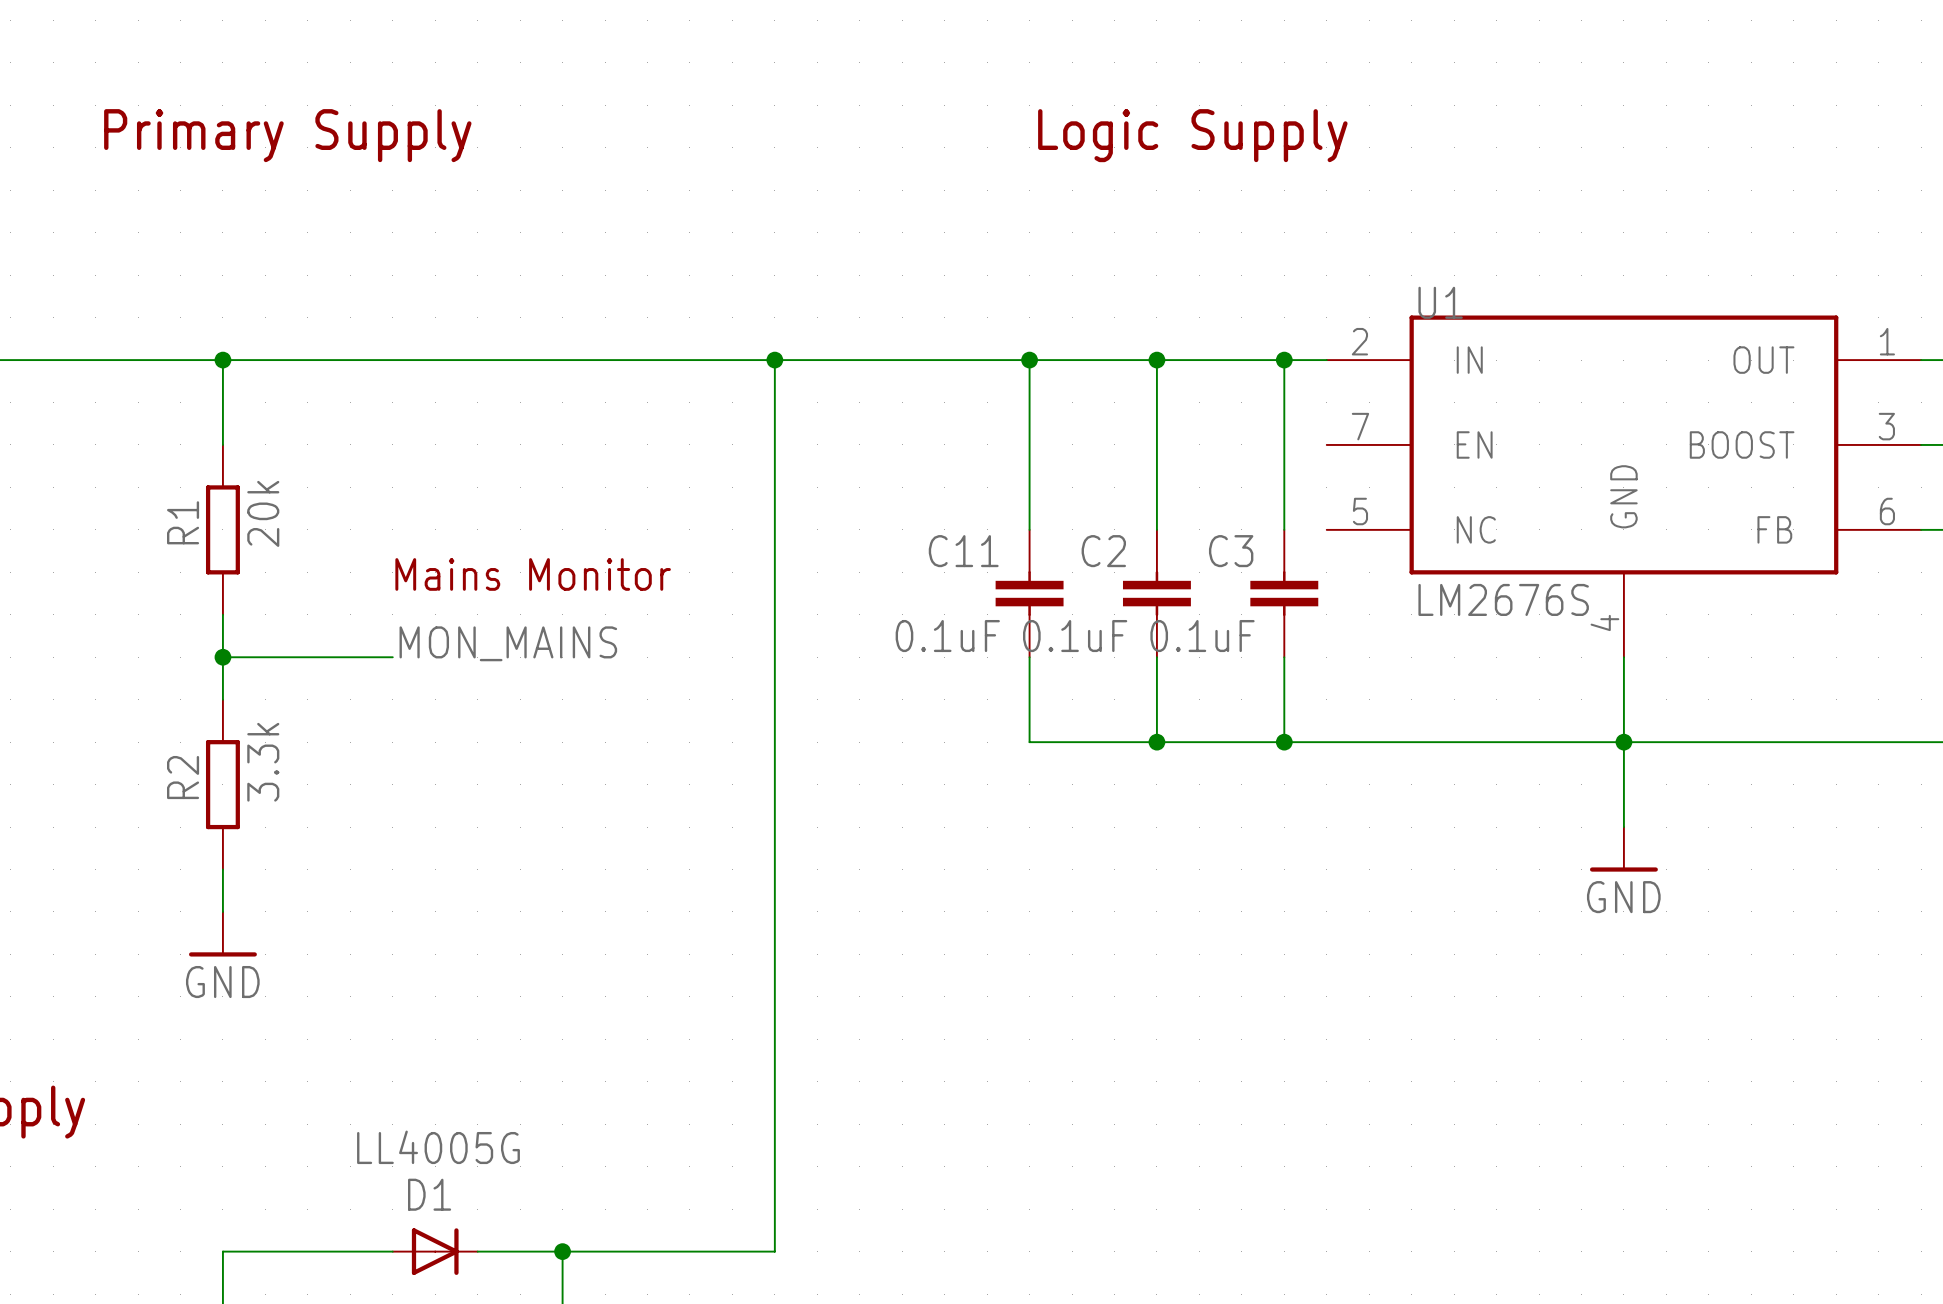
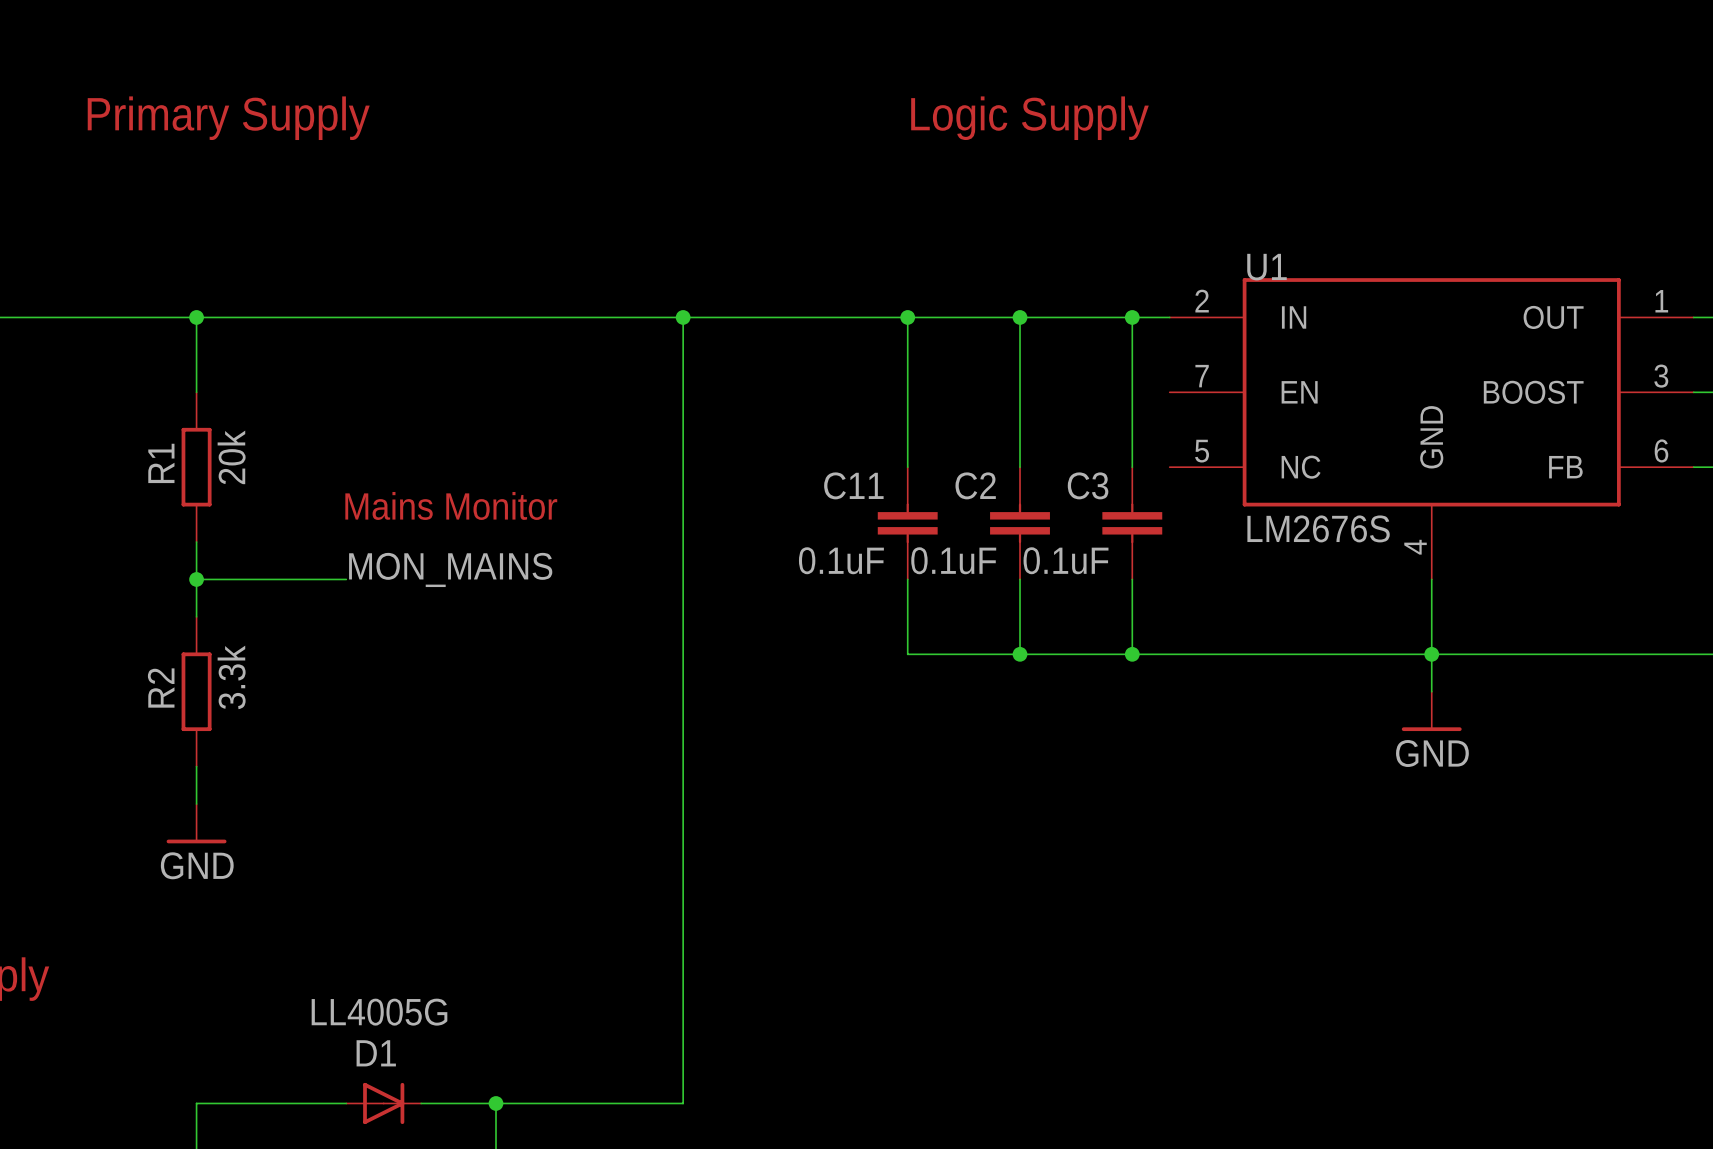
power symbol position: GND (1623, 849) -> GND (1431, 711)

